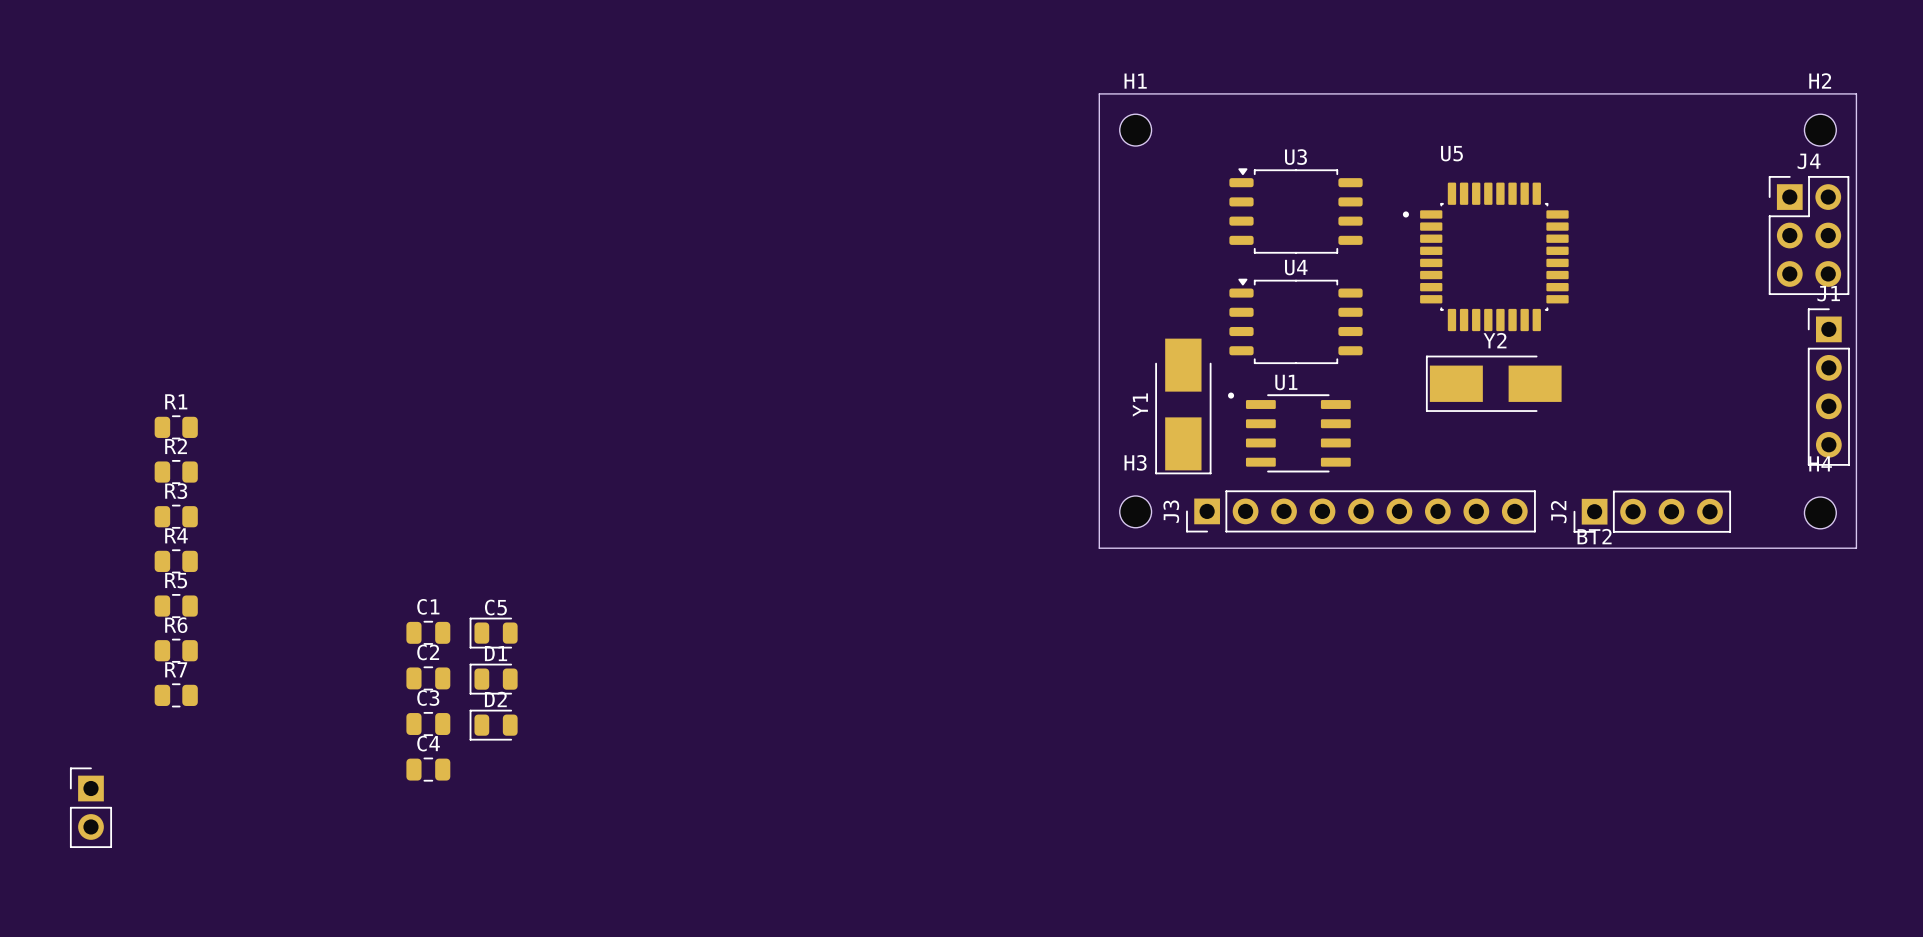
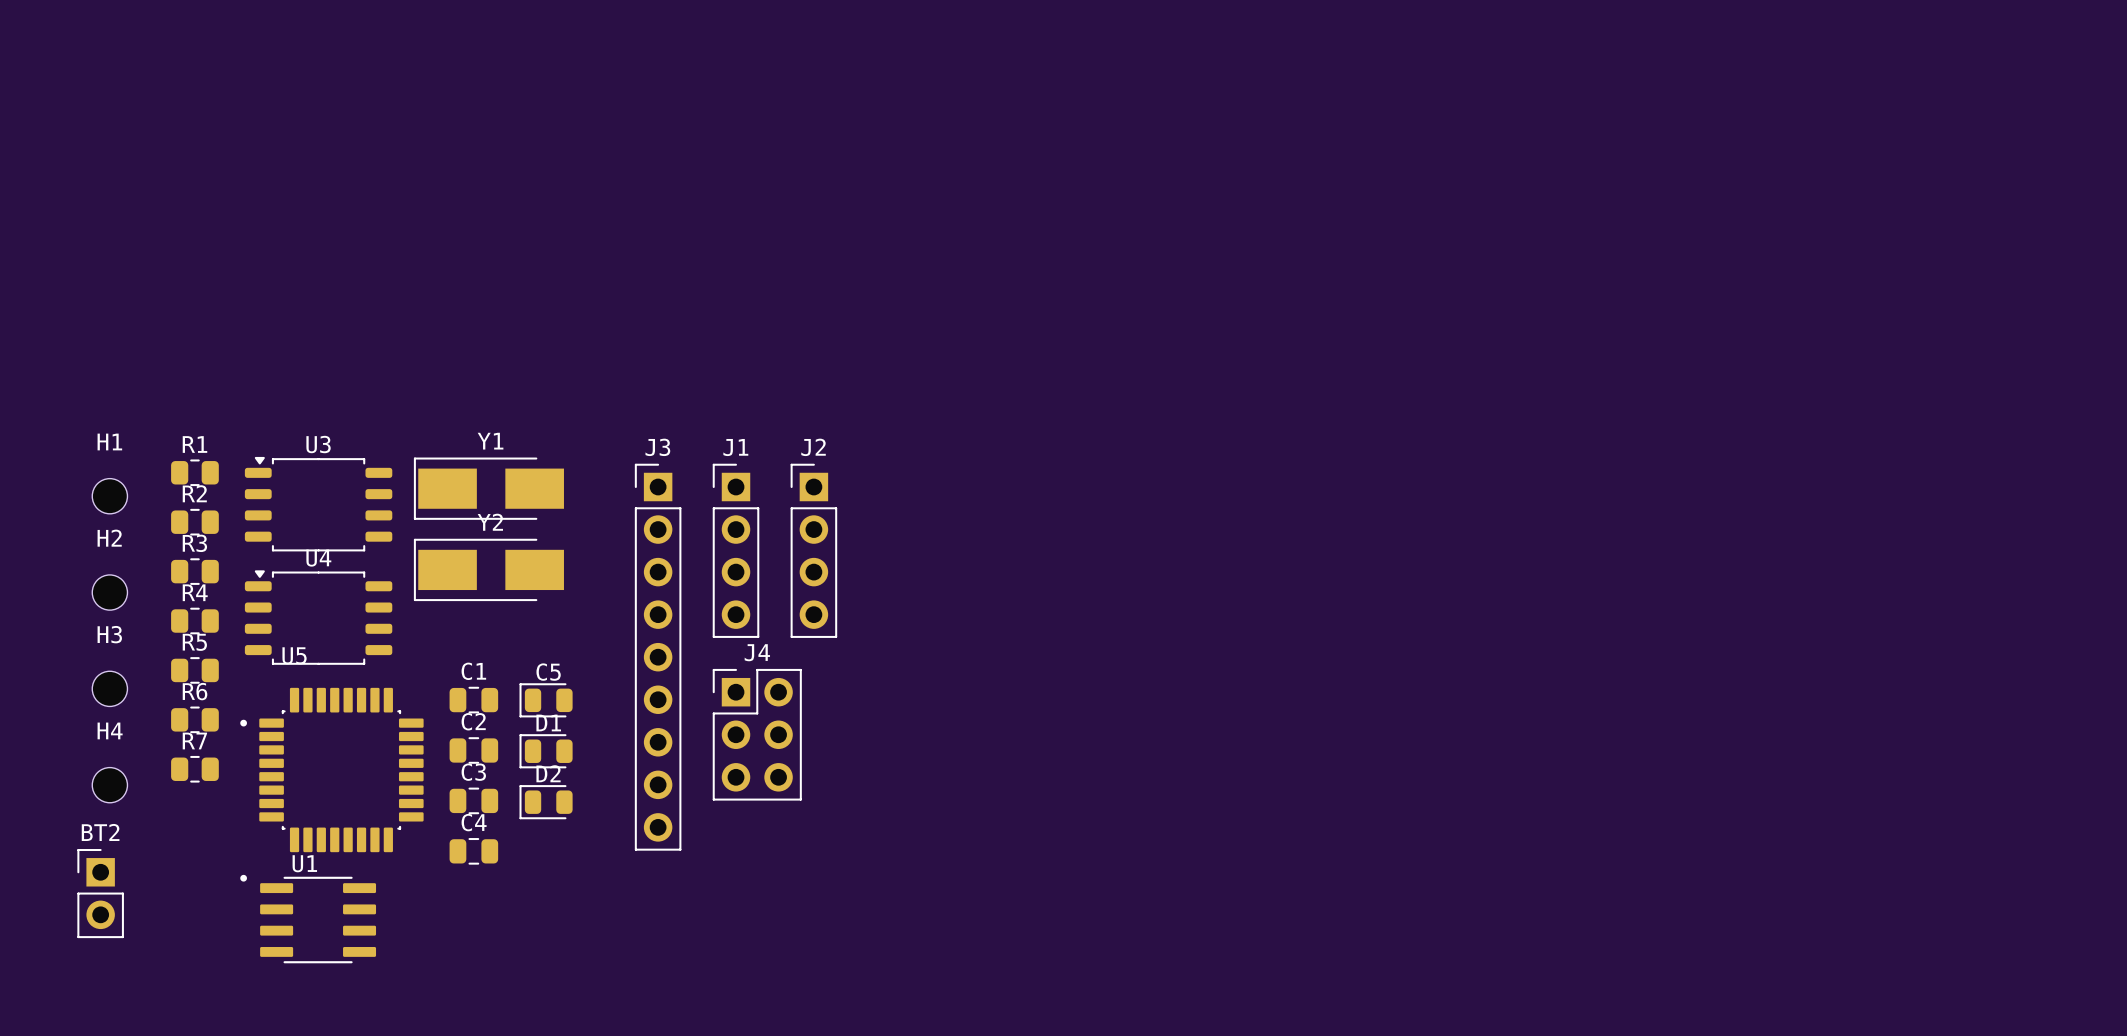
board edge: (1099, 93) (1856, 93) (1856, 548) (1099, 548) (1099, 93) -> none
H1 position: (1135, 130) -> (109, 496)
H2 position: (1820, 130) -> (109, 592)
U3 position: (1296, 210) -> (318, 504)
J4 position: (1809, 235) -> (757, 734)
U5 position: (1485, 256) -> (331, 770)
U4 position: (1296, 321) -> (318, 617)
Y2 position: (1493, 383) -> (488, 569)
J1 position: (1828, 387) -> (736, 550)
Y1 rotation: 0° (1183, 406) -> 90° clockwise (488, 488)
Y1 position: (1183, 406) -> (488, 488)
U1 position: (1289, 432) -> (308, 919)
H3 position: (1135, 511) -> (109, 688)
J3 rotation: 0° (1360, 511) -> 90° clockwise (658, 657)
J3 position: (1360, 511) -> (658, 657)
J2 rotation: 0° (1652, 511) -> 90° clockwise (813, 550)
J2 position: (1652, 511) -> (813, 550)
H4 position: (1820, 512) -> (109, 785)
BT2 name position: BT2 (1594, 536) -> BT2 (100, 832)

